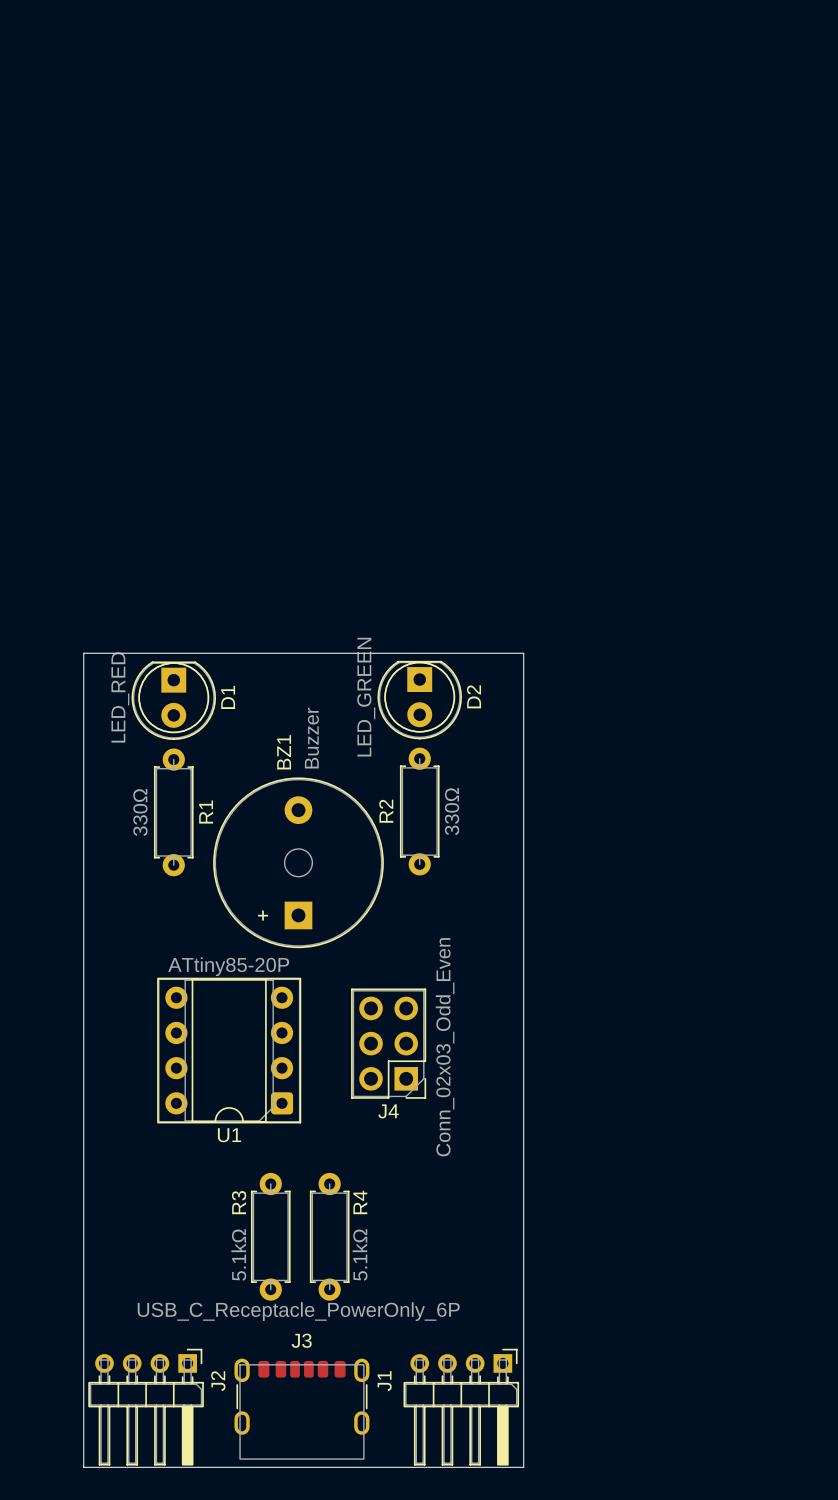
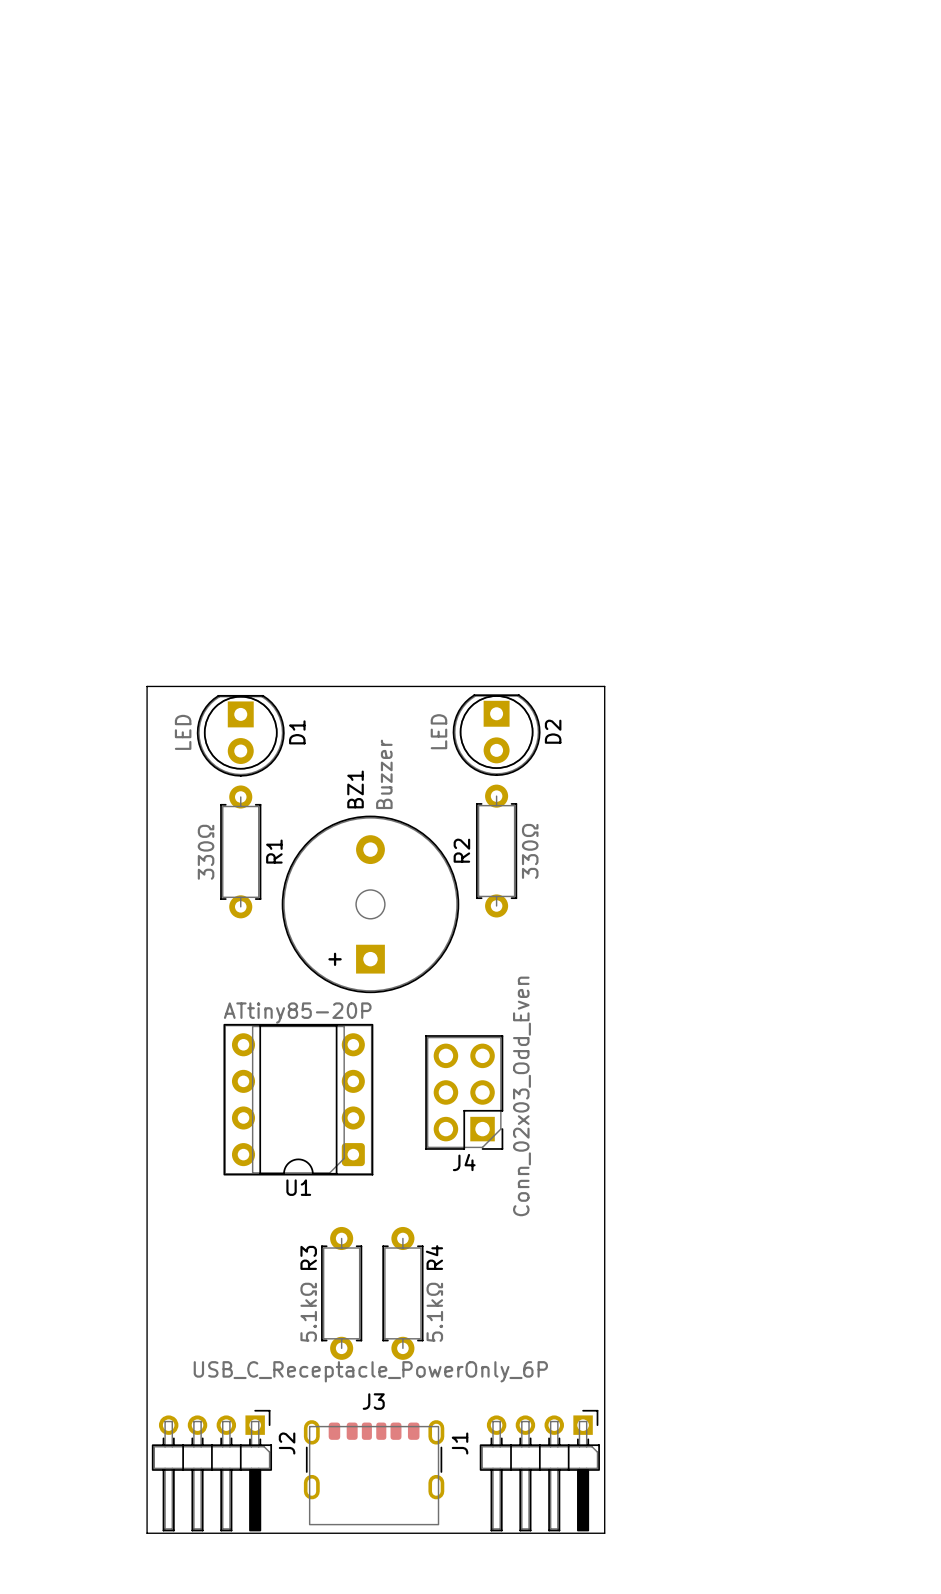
D1 value: LED_RED (120, 697) -> LED (183, 732)
D2 value: LED_GREEN (366, 697) -> LED (438, 731)

